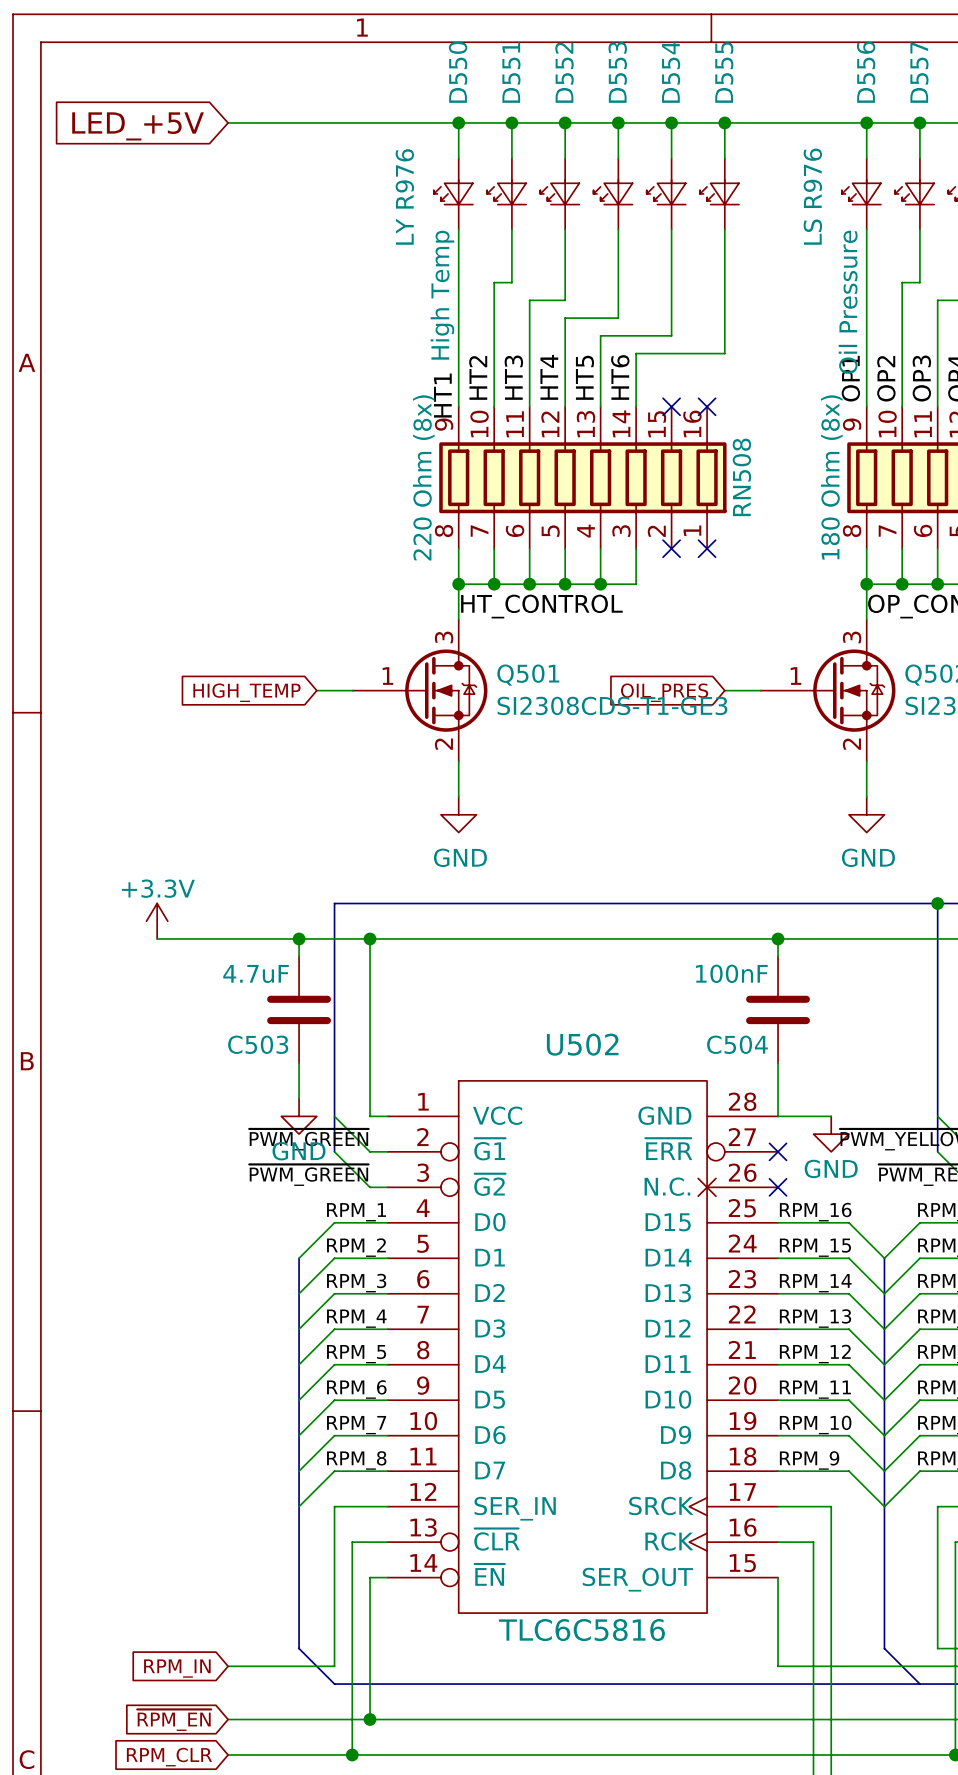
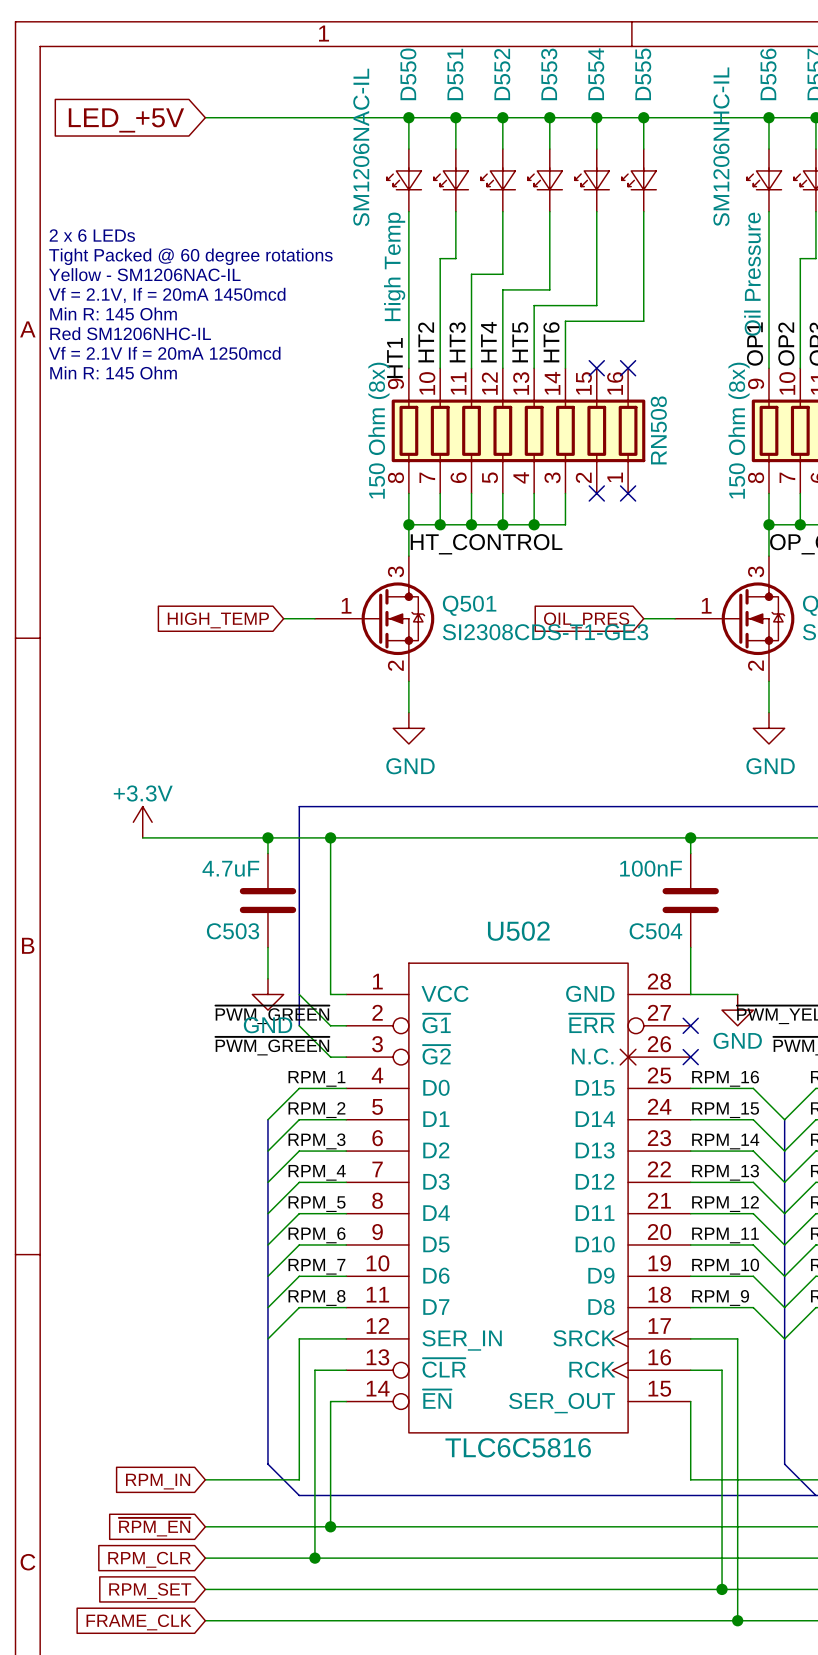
D550 value: LY R976 (404, 196) -> SM1206NAC-IL (361, 147)
D556 value: LS R976 (812, 196) -> SM1206NHC-IL (721, 146)
text: none -> 2 x 6 LEDs (92, 235)
text: none -> Tight Packed @ 60 degree rotations (190, 256)
text: none -> Yellow - SM1206NAC-IL (144, 274)
text: none -> Vf = 2.1V, If = 20mA 1450mcd (167, 295)
text: none -> Min R: 145 Ohm (113, 313)
text: none -> Red SM1206NHC-IL (130, 333)
text: none -> Vf = 2.1V If = 20mA 1250mcd (164, 353)
text: none -> Min R: 145 Ohm (113, 372)
RN508 value: 220 Ohm (8x) (423, 477) -> 150 Ohm (8x) (378, 430)
part value: 180 Ohm (8x) (831, 477) -> 150 Ohm (8x) (739, 430)

